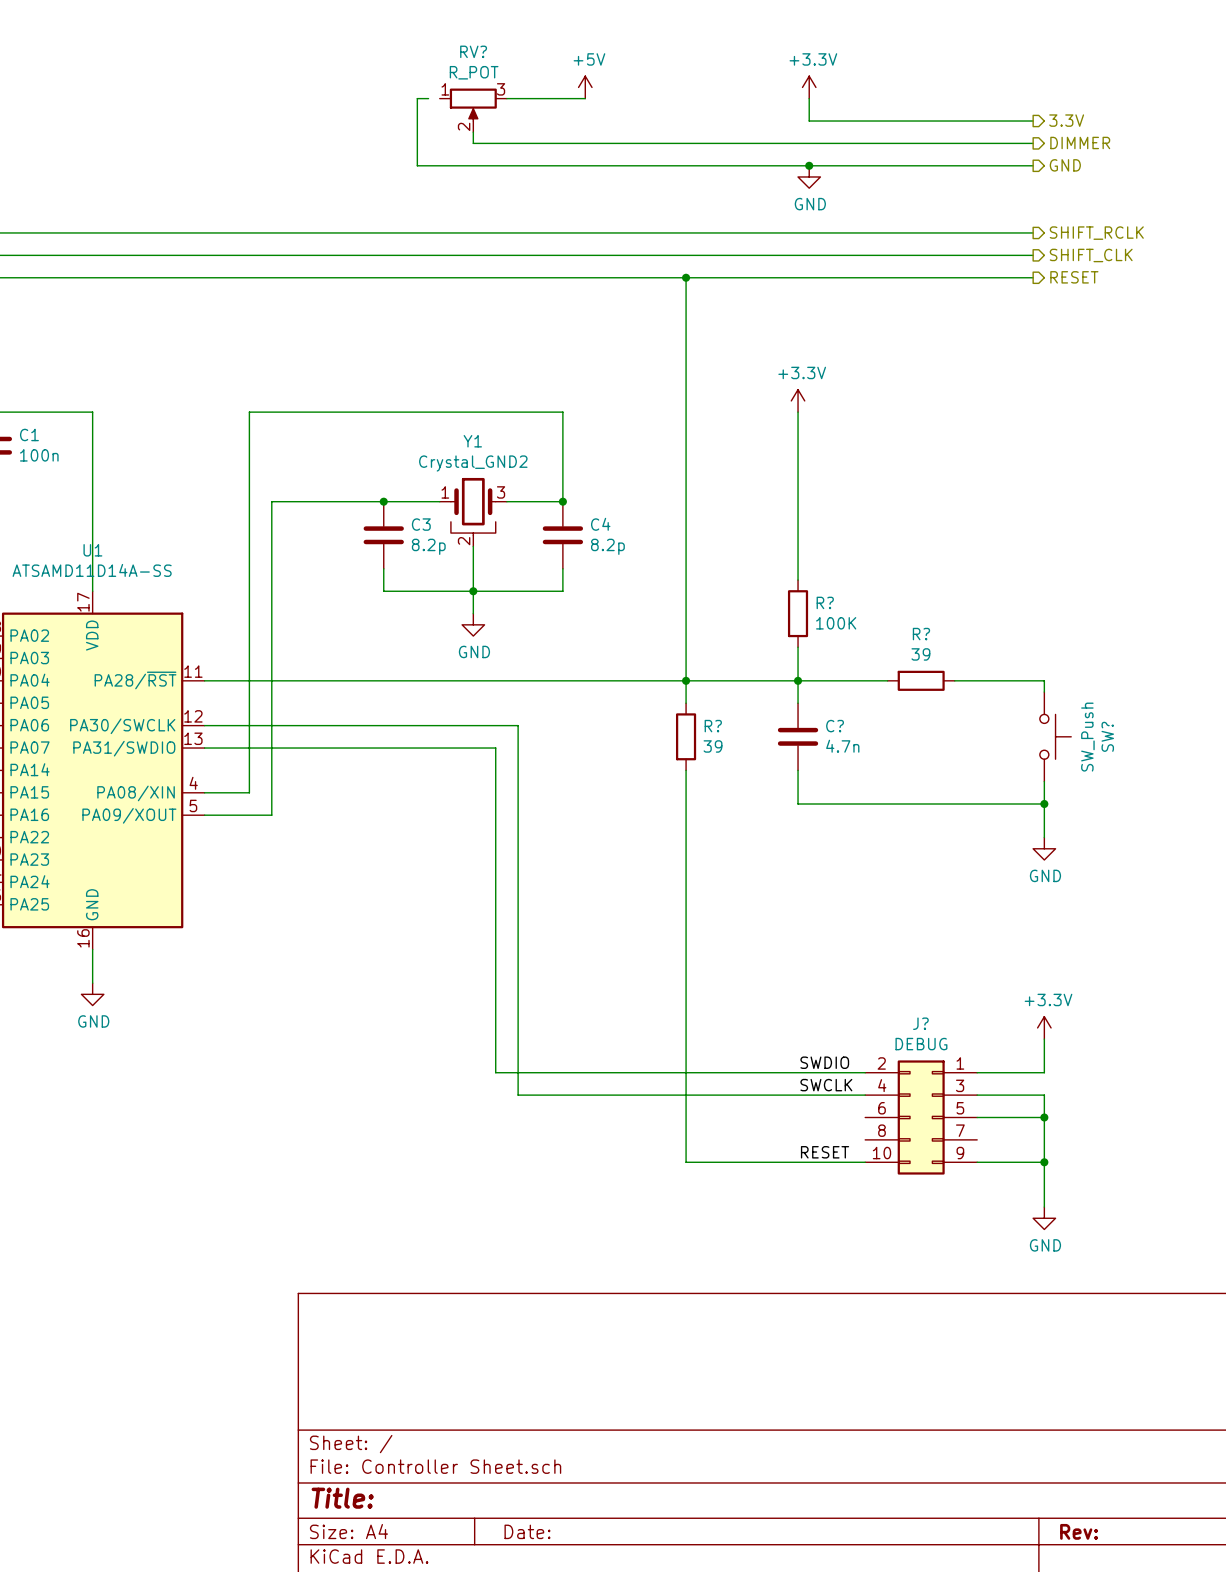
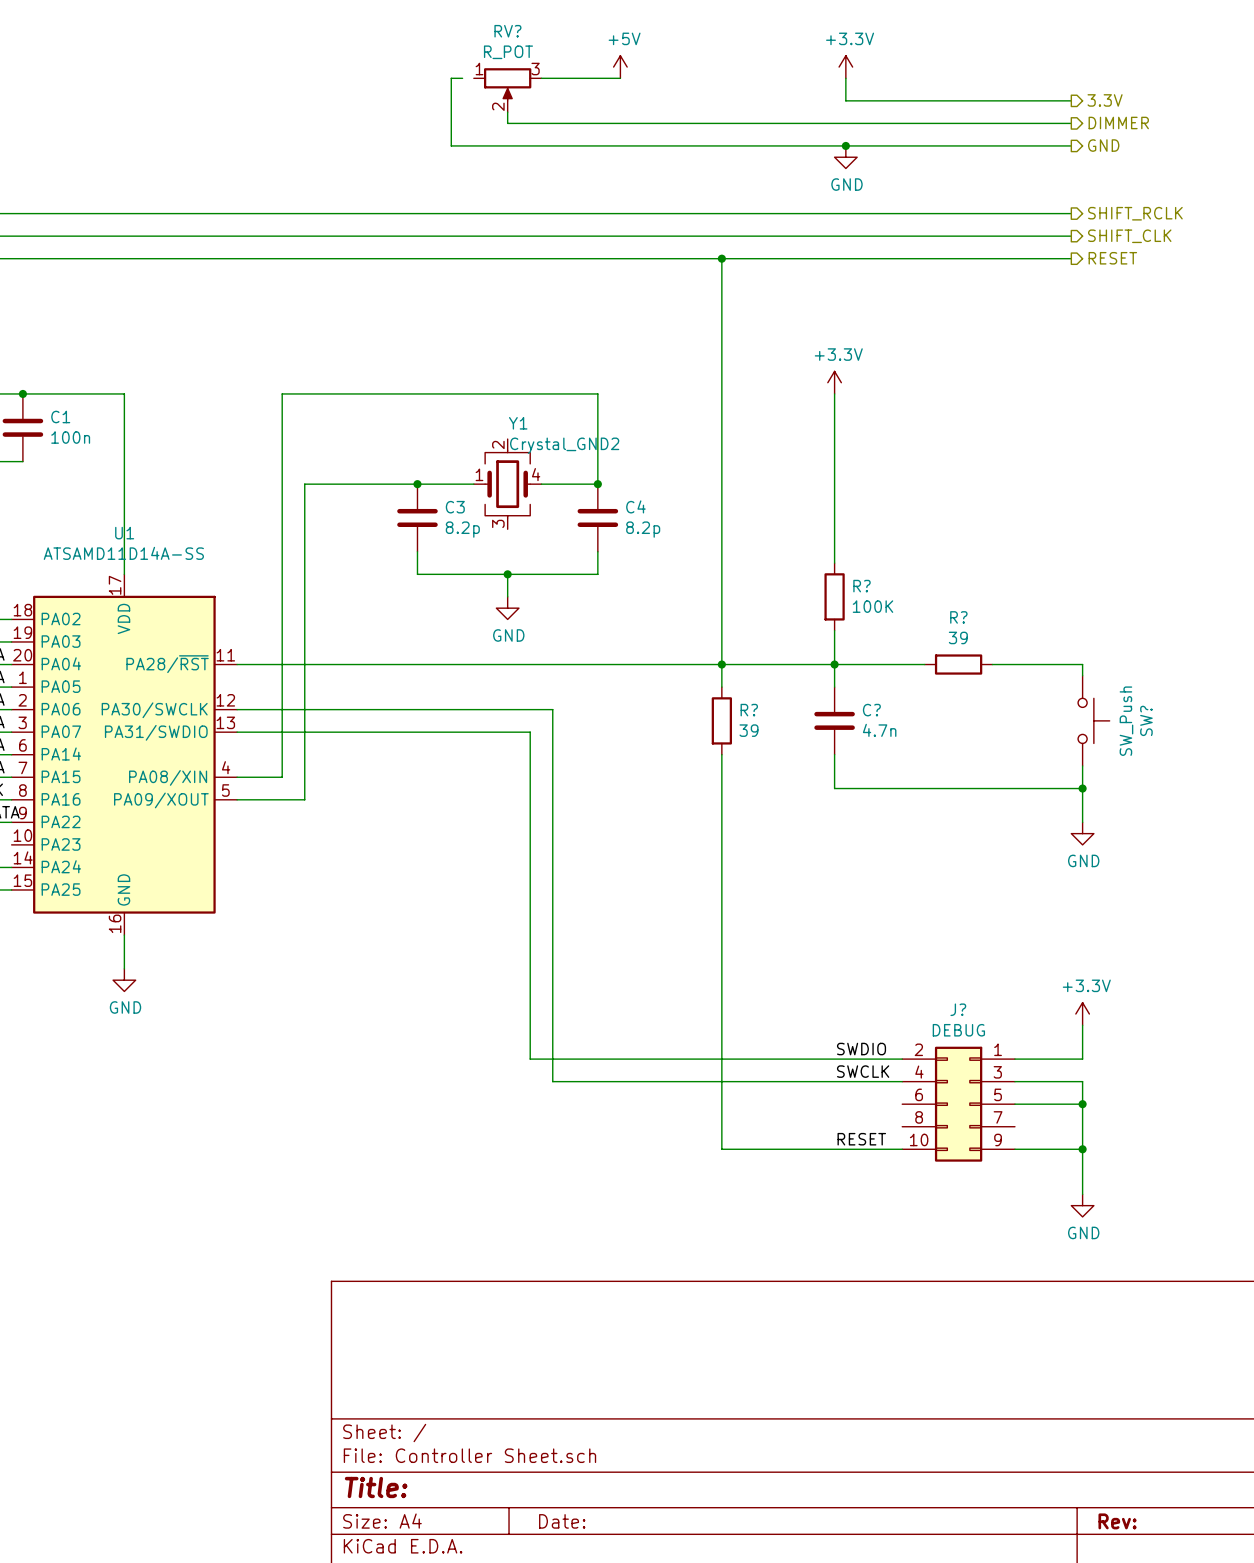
Y1 value position: Crystal_GND2 (473, 463) -> Crystal_GND2 (564, 445)
Y1 symbol: [439, 477, 507, 547] -> [473, 439, 542, 530]
wire: (473, 546) (473, 591) -> none

